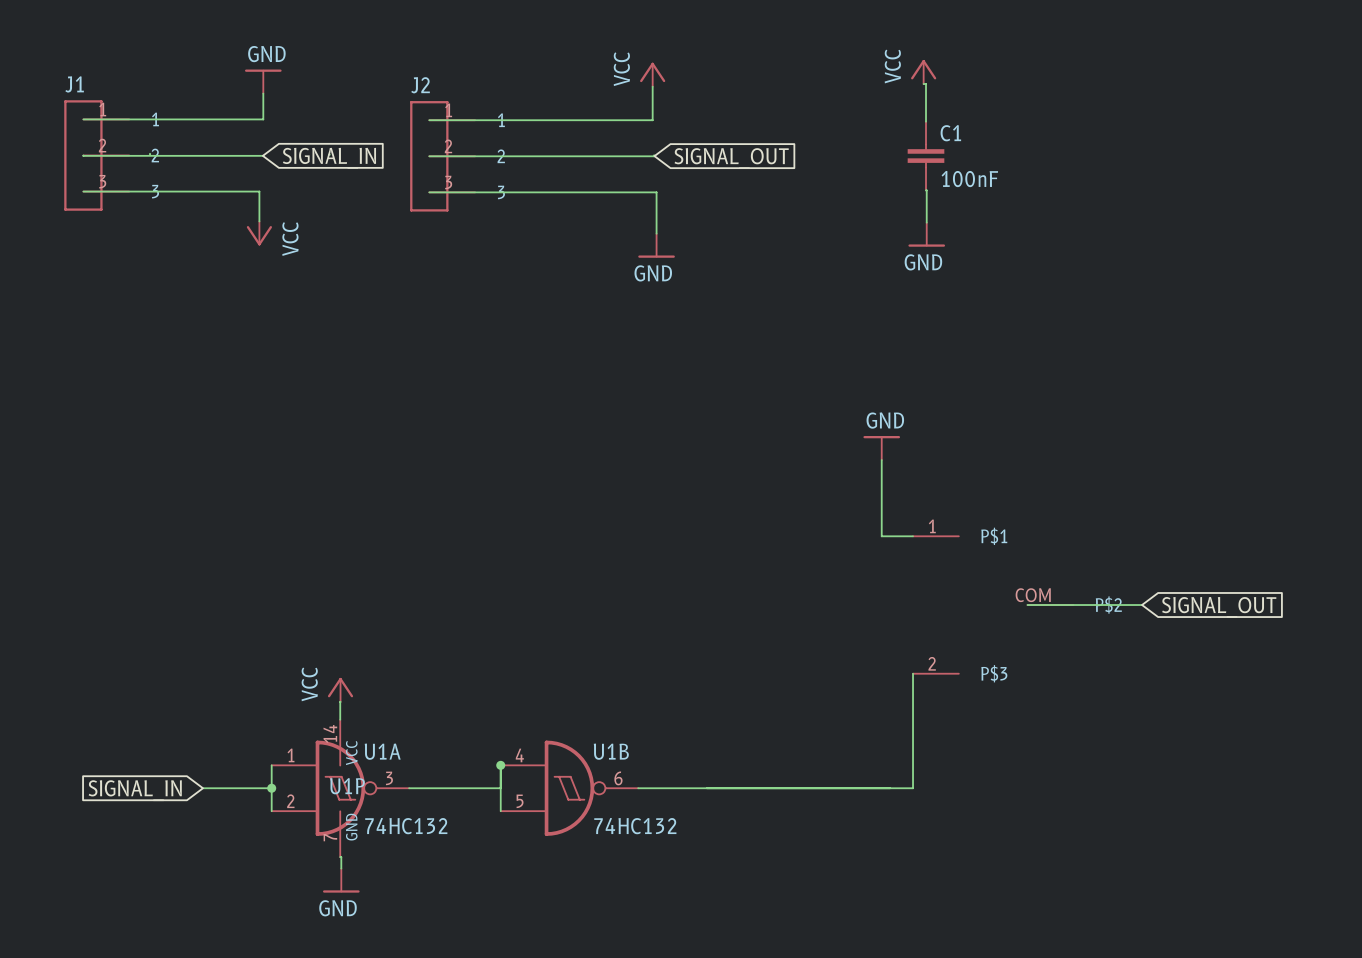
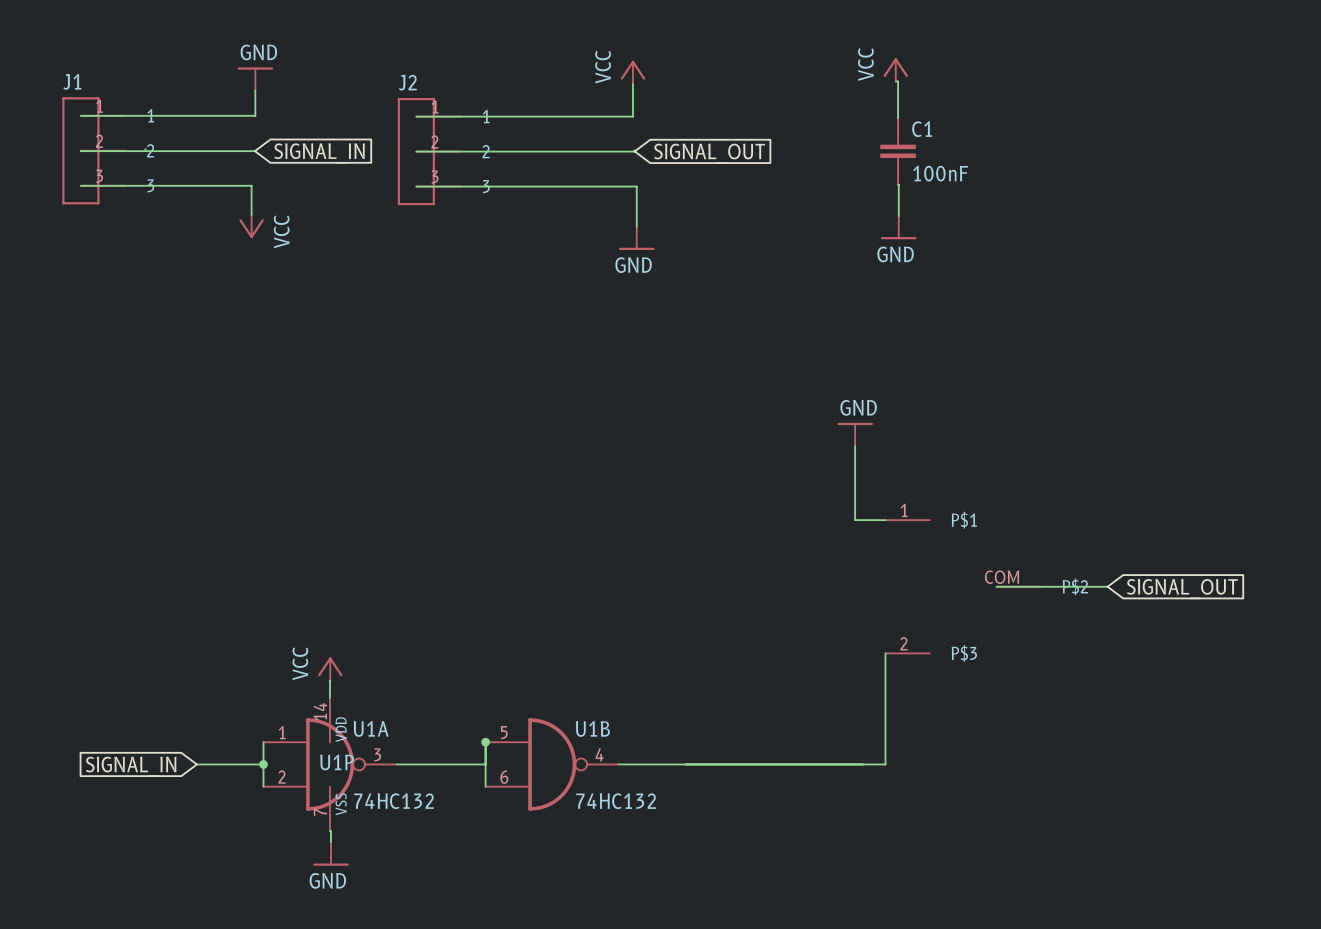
U1A symbol: [271, 740, 410, 836] -> [263, 718, 397, 811]
U1B symbol: [500, 740, 639, 836] -> [485, 718, 619, 811]
U1P text: VCC (351, 753) -> VDD (341, 729)
U1P text: GND (351, 827) -> VSS (341, 804)

